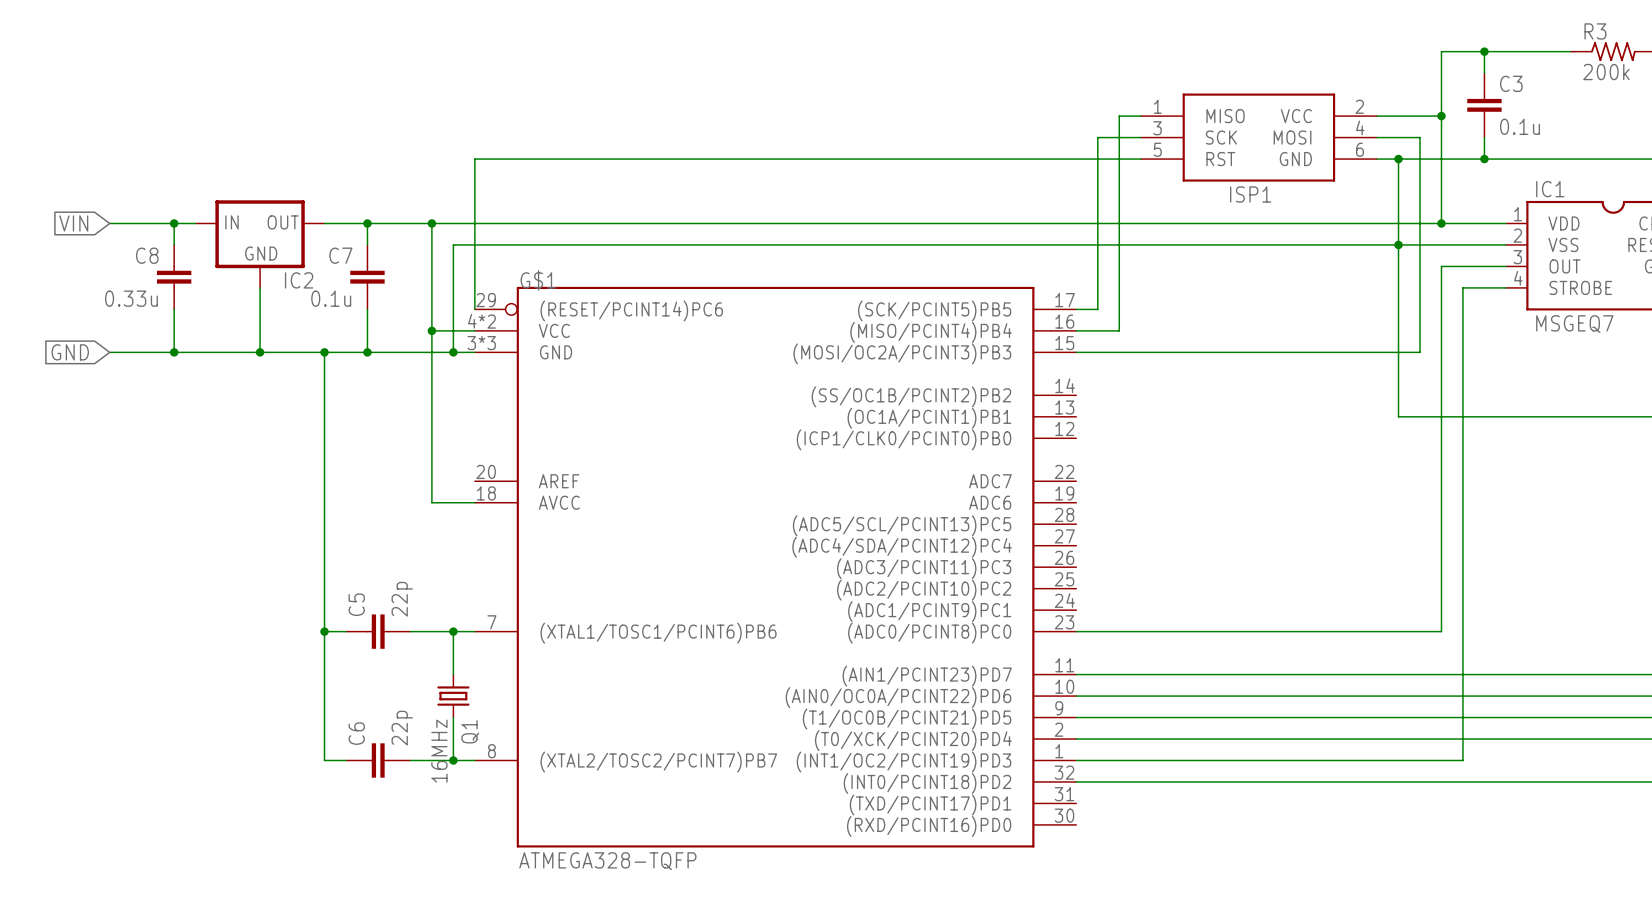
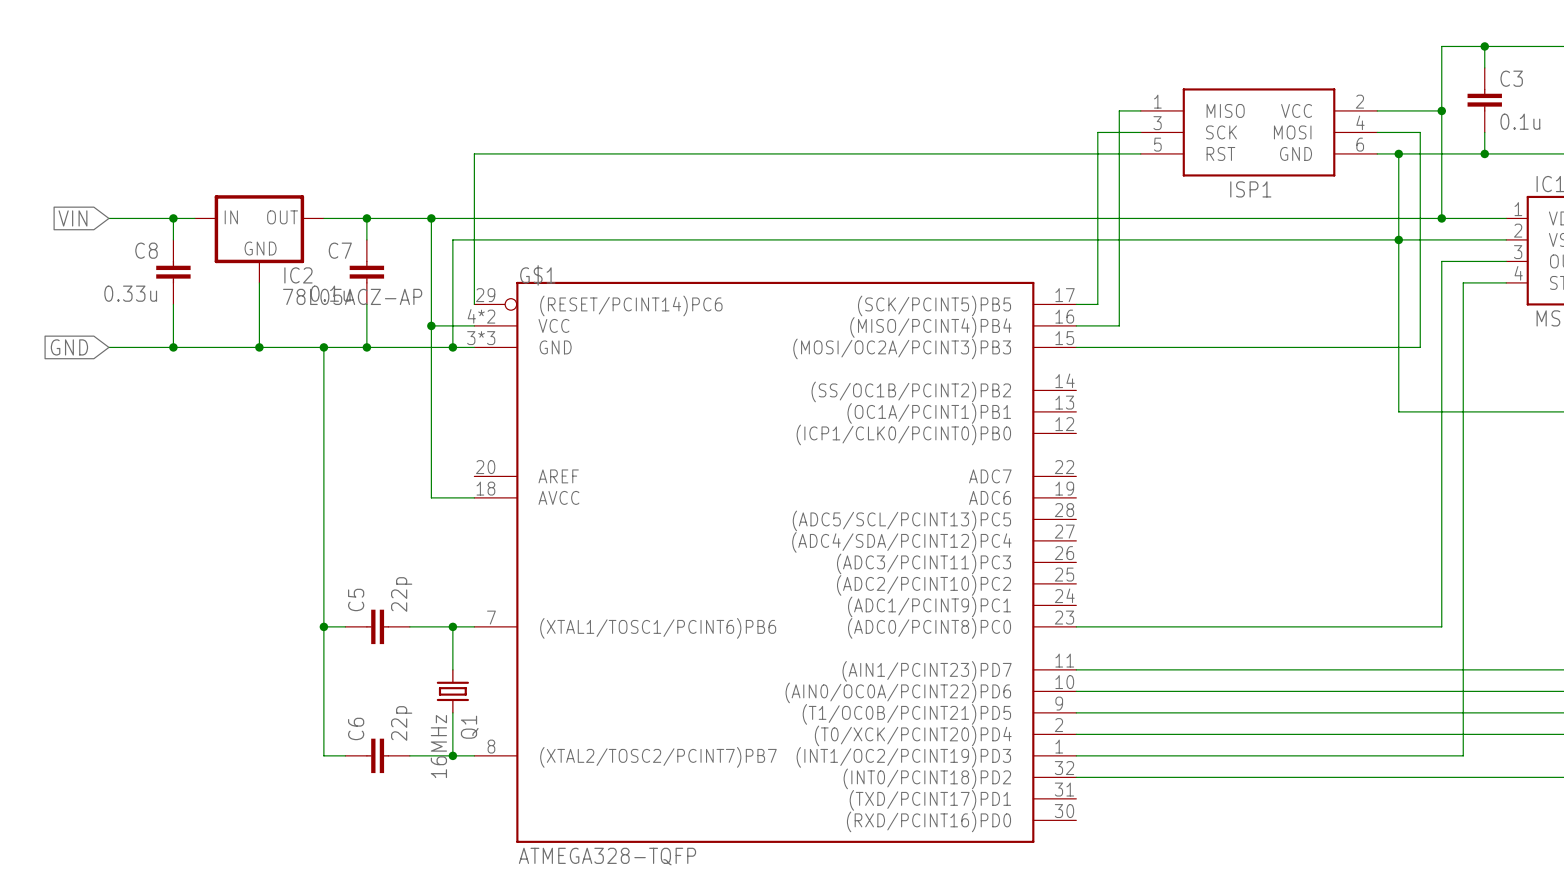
IC2 value: none -> 78L05ACZ-AP (352, 296)

